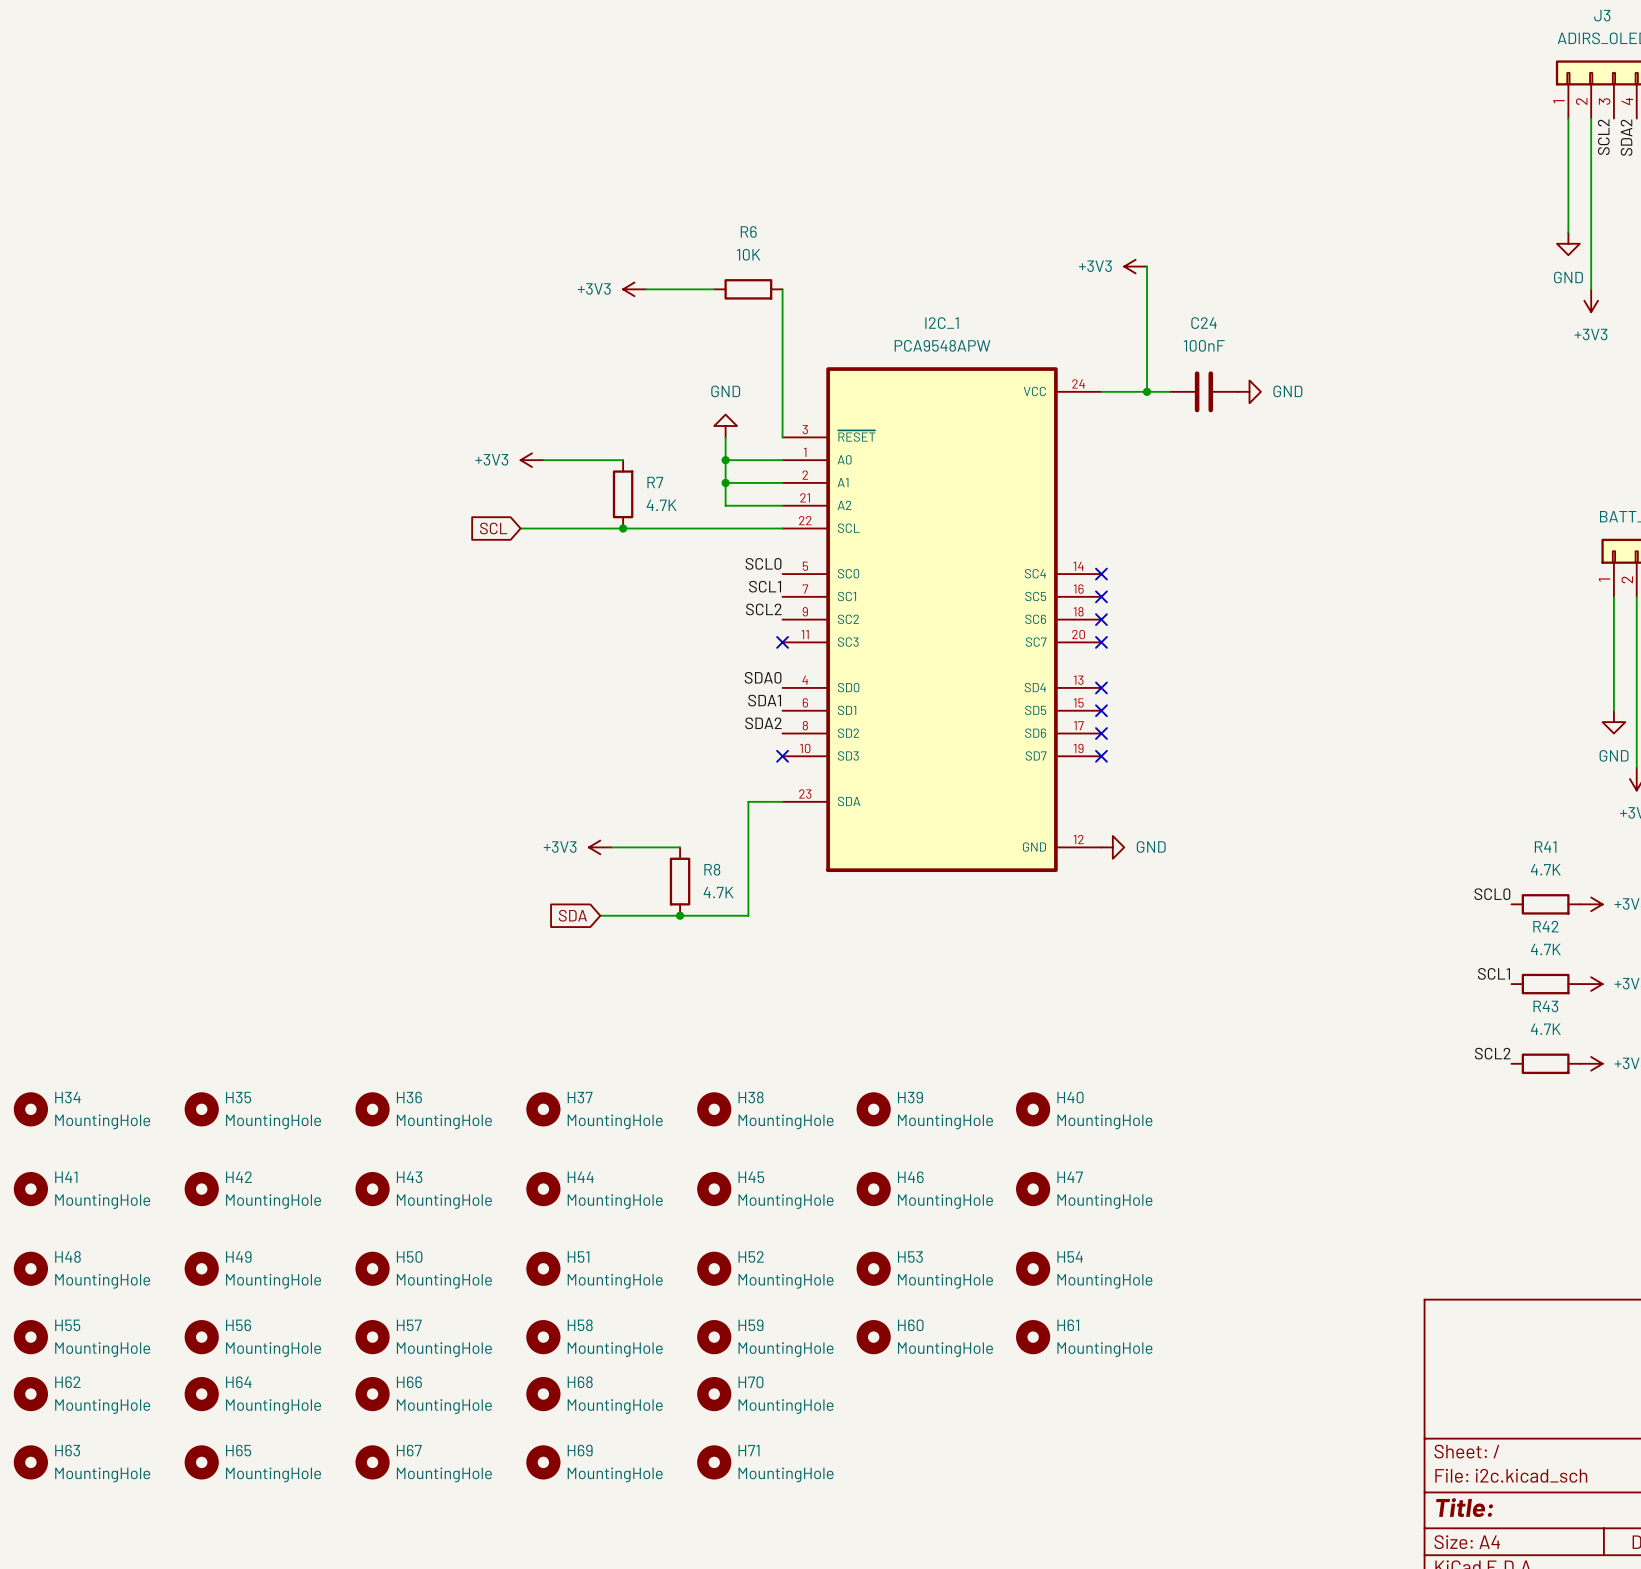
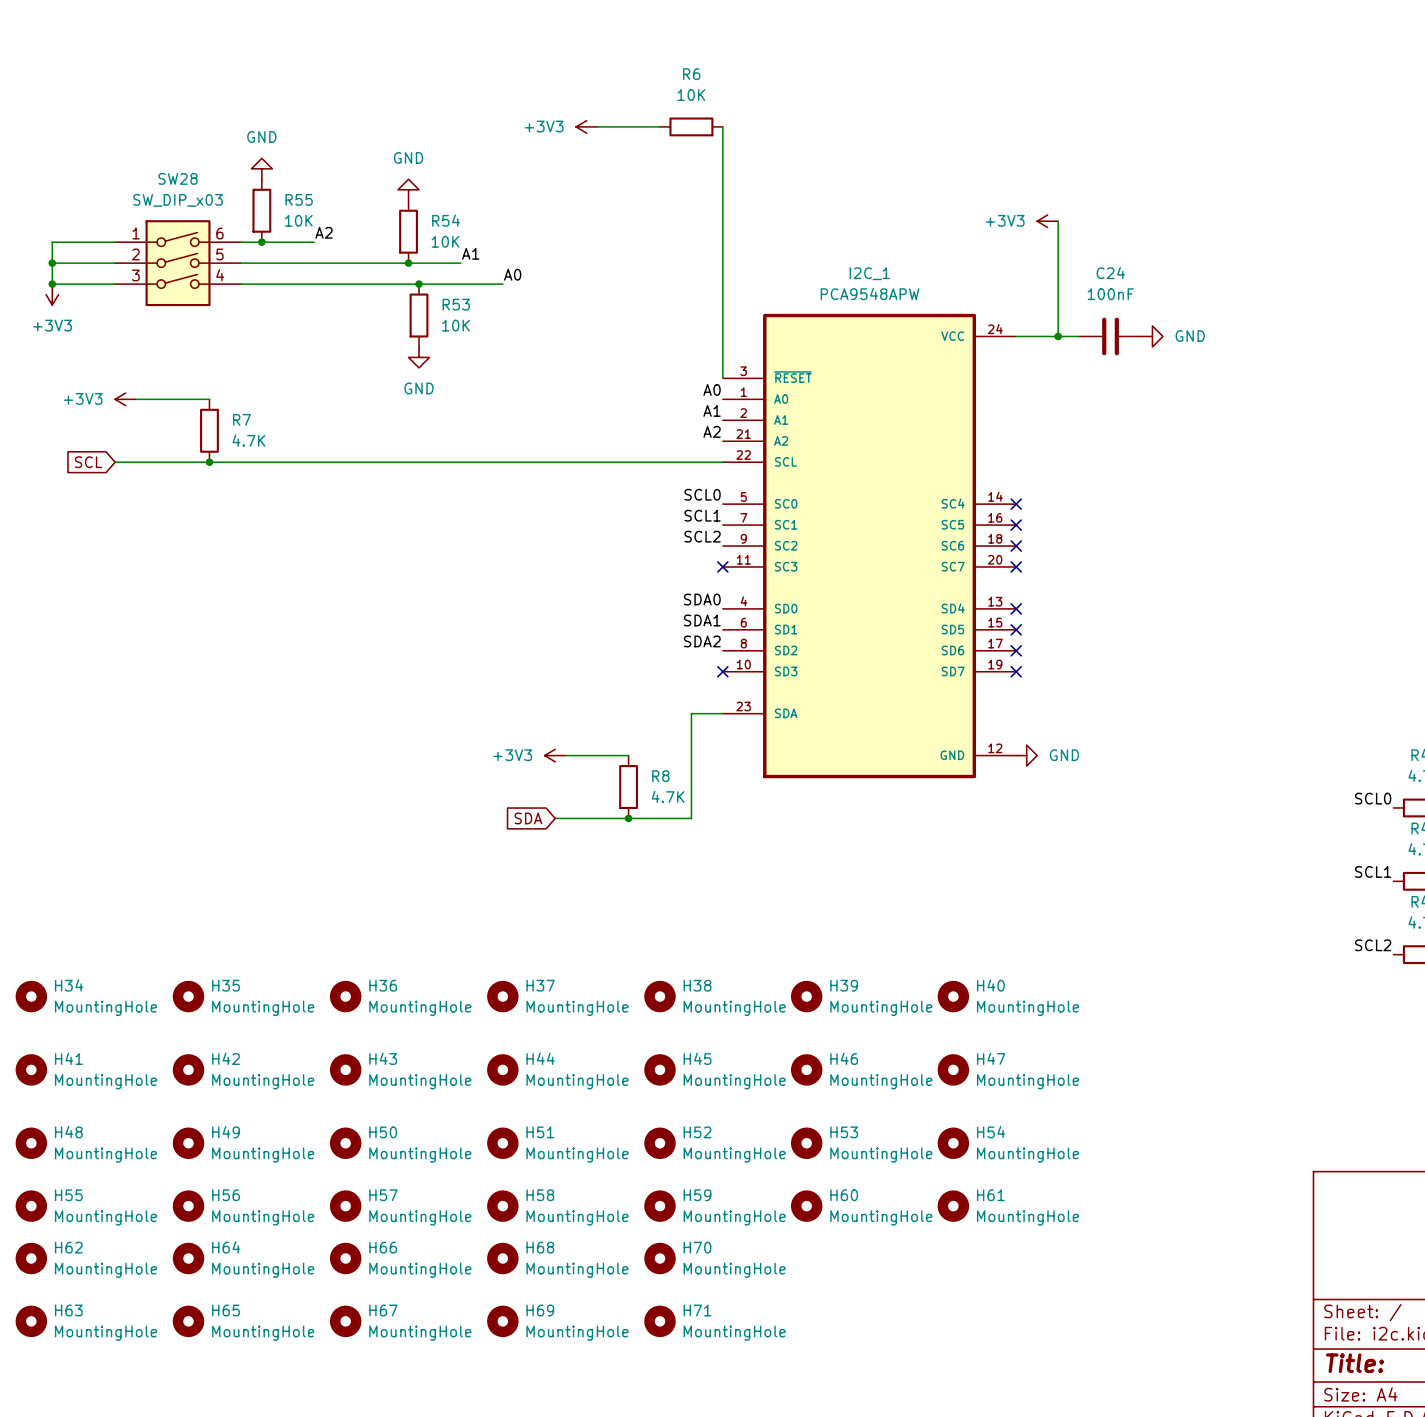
wire: none -> (722, 126) (722, 242)
power symbol: none -> GND (261, 168)
power symbol: none -> GND (408, 189)
R55: none -> 10K (261, 210)
R54: none -> 10K (408, 231)
label: none -> A2 (324, 232)
wire: none -> (115, 242) (52, 242) (52, 284) (115, 284)
wire: none -> (240, 242) (314, 242)
junction: none -> (261, 242)
power symbol position: +3V3 (634, 289) -> +3V3 (586, 126)
wire: (645, 289) (714, 289) -> (597, 126) (660, 126)
R6 position: (748, 289) -> (691, 126)
label: none -> A1 (470, 253)
wire: none -> (52, 263) (115, 263)
junction: none -> (52, 263)
SW28: none -> SW_DIP_x03 (178, 263)
wire: none -> (240, 263) (460, 263)
junction: none -> (408, 263)
label: none -> A0 (512, 274)
junction: none -> (52, 284)
wire: none -> (240, 284) (502, 284)
junction: none -> (419, 284)
power symbol: none -> +3V3 (52, 294)
R53: none -> 10K (419, 315)
power symbol: none -> GND (419, 357)
power symbol: GND (725, 426) -> none
wire: (725, 437) (725, 505) (782, 505) -> none
label: none -> A0 (712, 389)
power symbol: none -> +3V3 (125, 399)
wire: none -> (136, 399) (209, 399)
power symbol: +3V3 (532, 460) -> none
wire: (543, 460) (623, 460) -> none
wire: (725, 460) (782, 460) -> none
junction: (725, 460) -> none
label: none -> A1 (712, 410)
wire: (725, 482) (782, 482) -> none
junction: (725, 482) -> none
R7 position: (623, 494) -> (209, 430)
label: none -> A2 (712, 431)
global label: none -> SCL (88, 462)
wire: none -> (115, 462) (481, 462)
junction: none -> (209, 462)
global label: SCL (493, 528) -> none
junction: (623, 528) -> none

